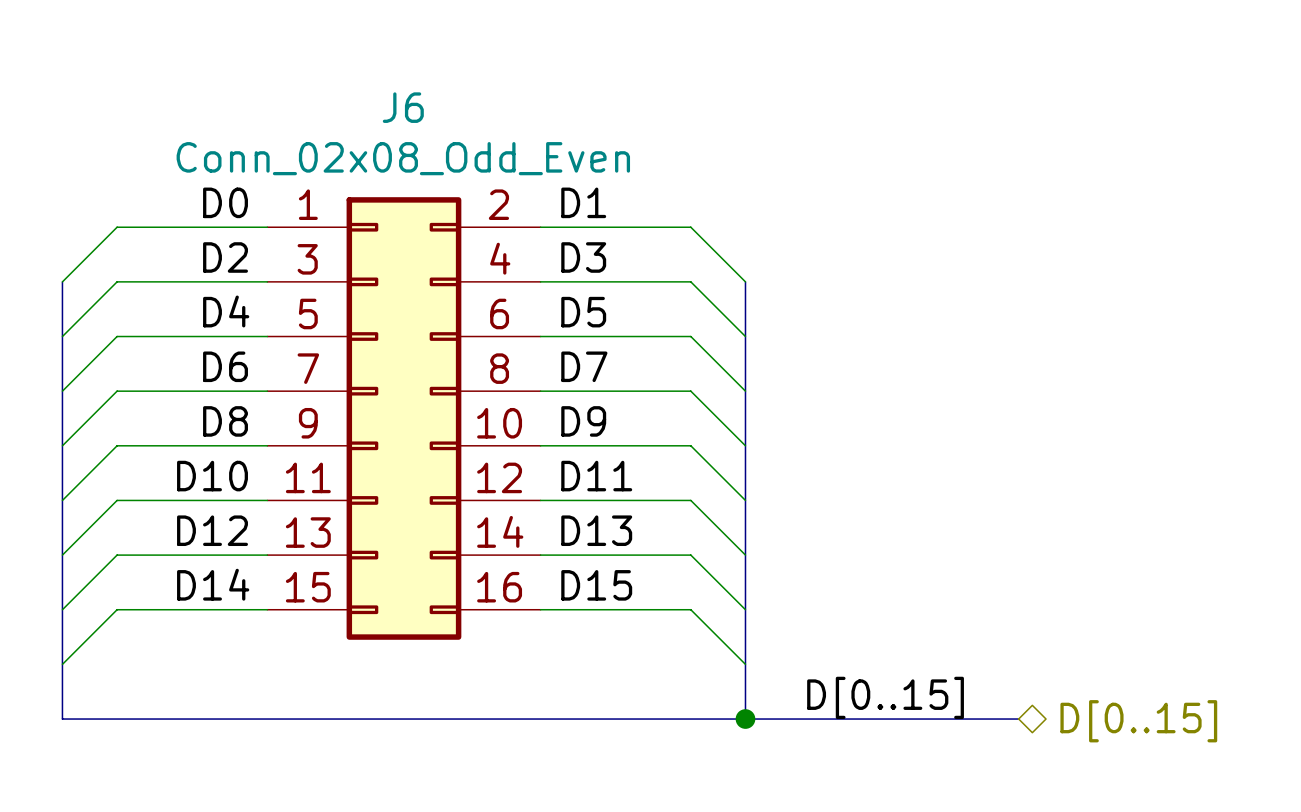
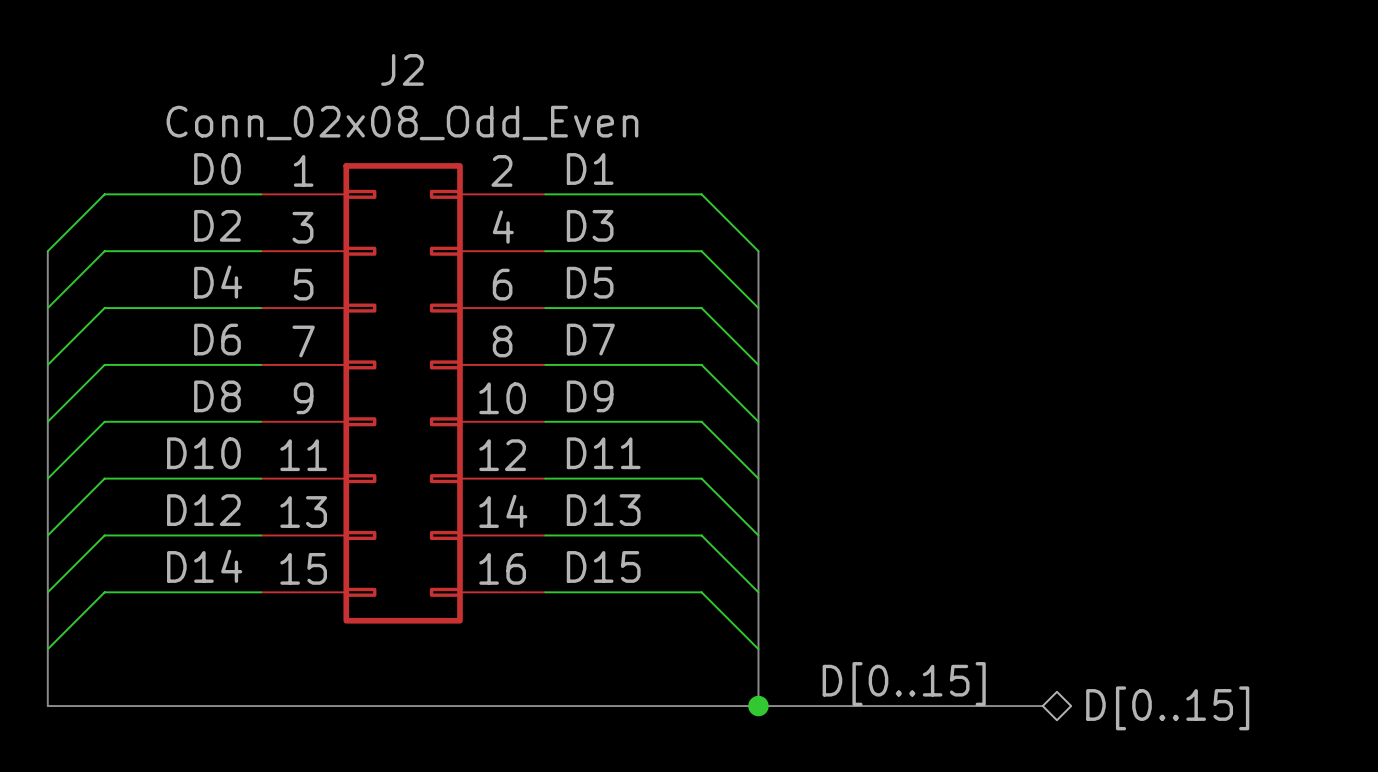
J6 name: J6 (403, 107) -> J2 (402, 69)

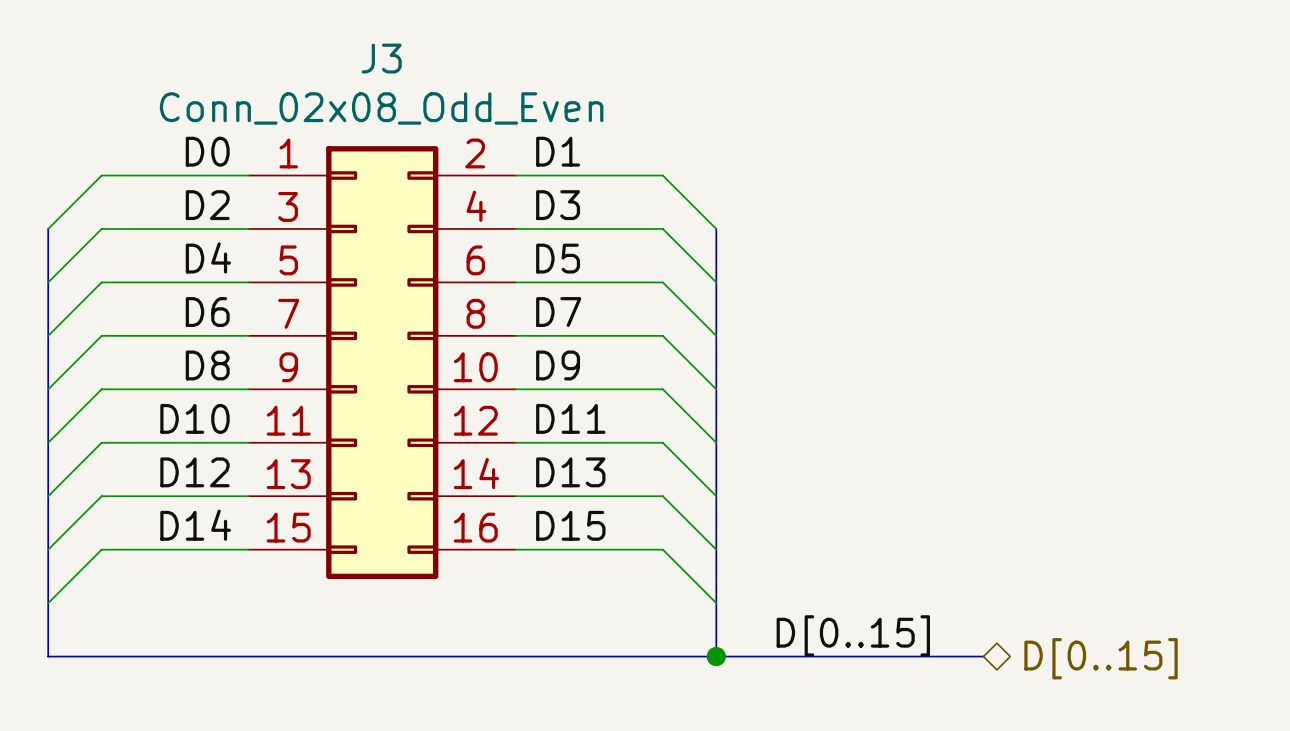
J2 name: J2 (402, 69) -> J3 (381, 58)

